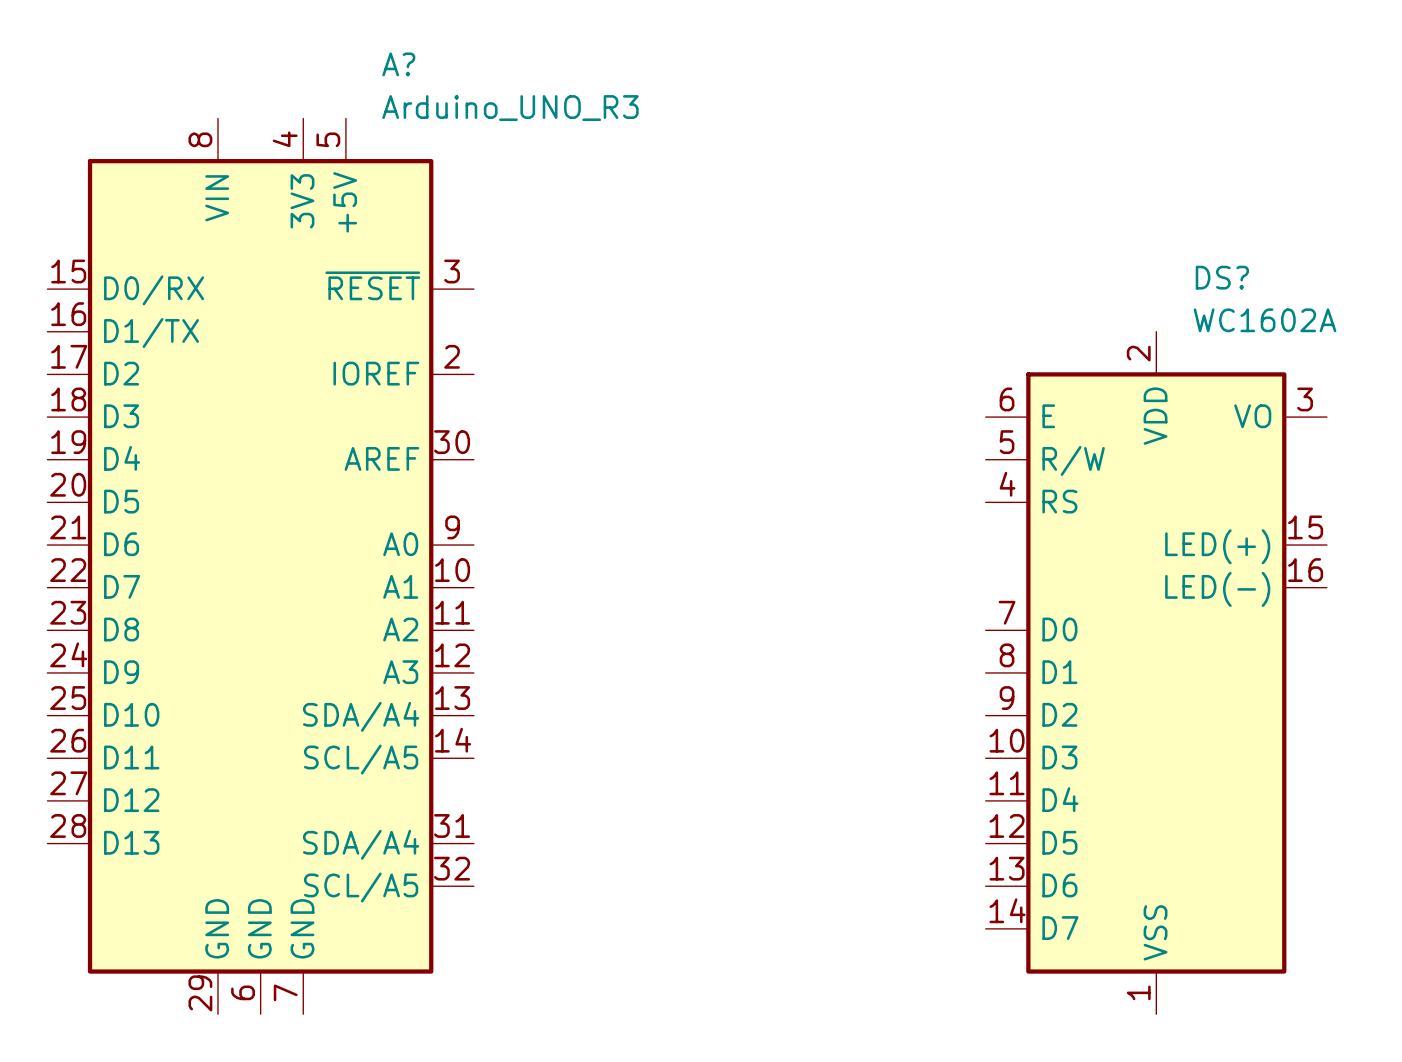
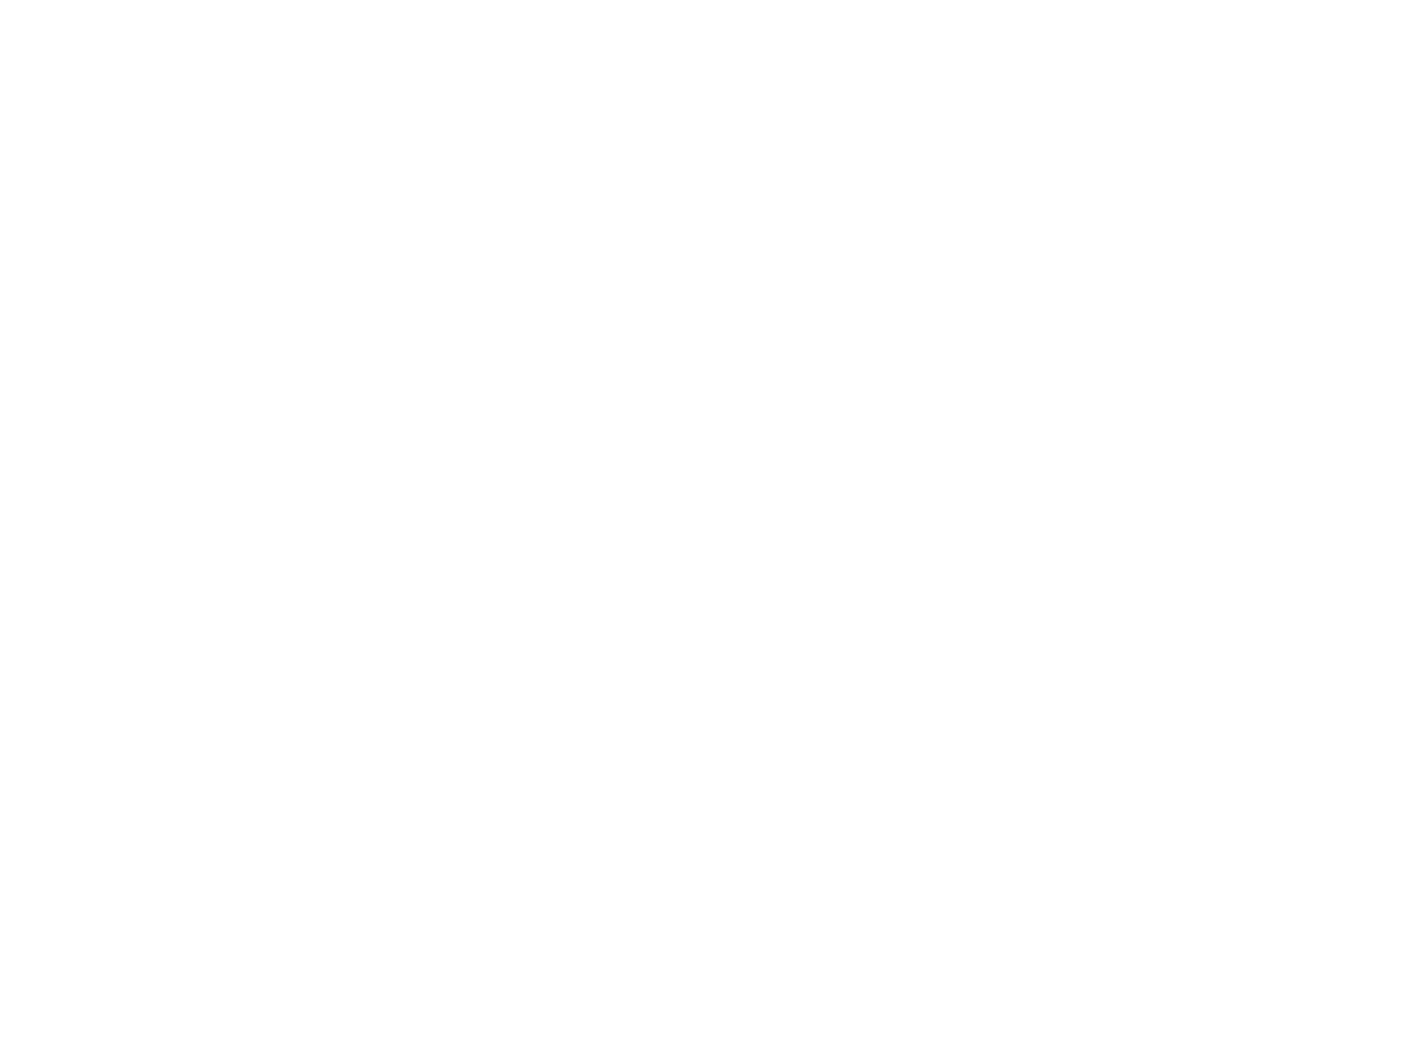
A?: Arduino_UNO_R3 (260, 566) -> none
DS?: WC1602A (1156, 672) -> none

